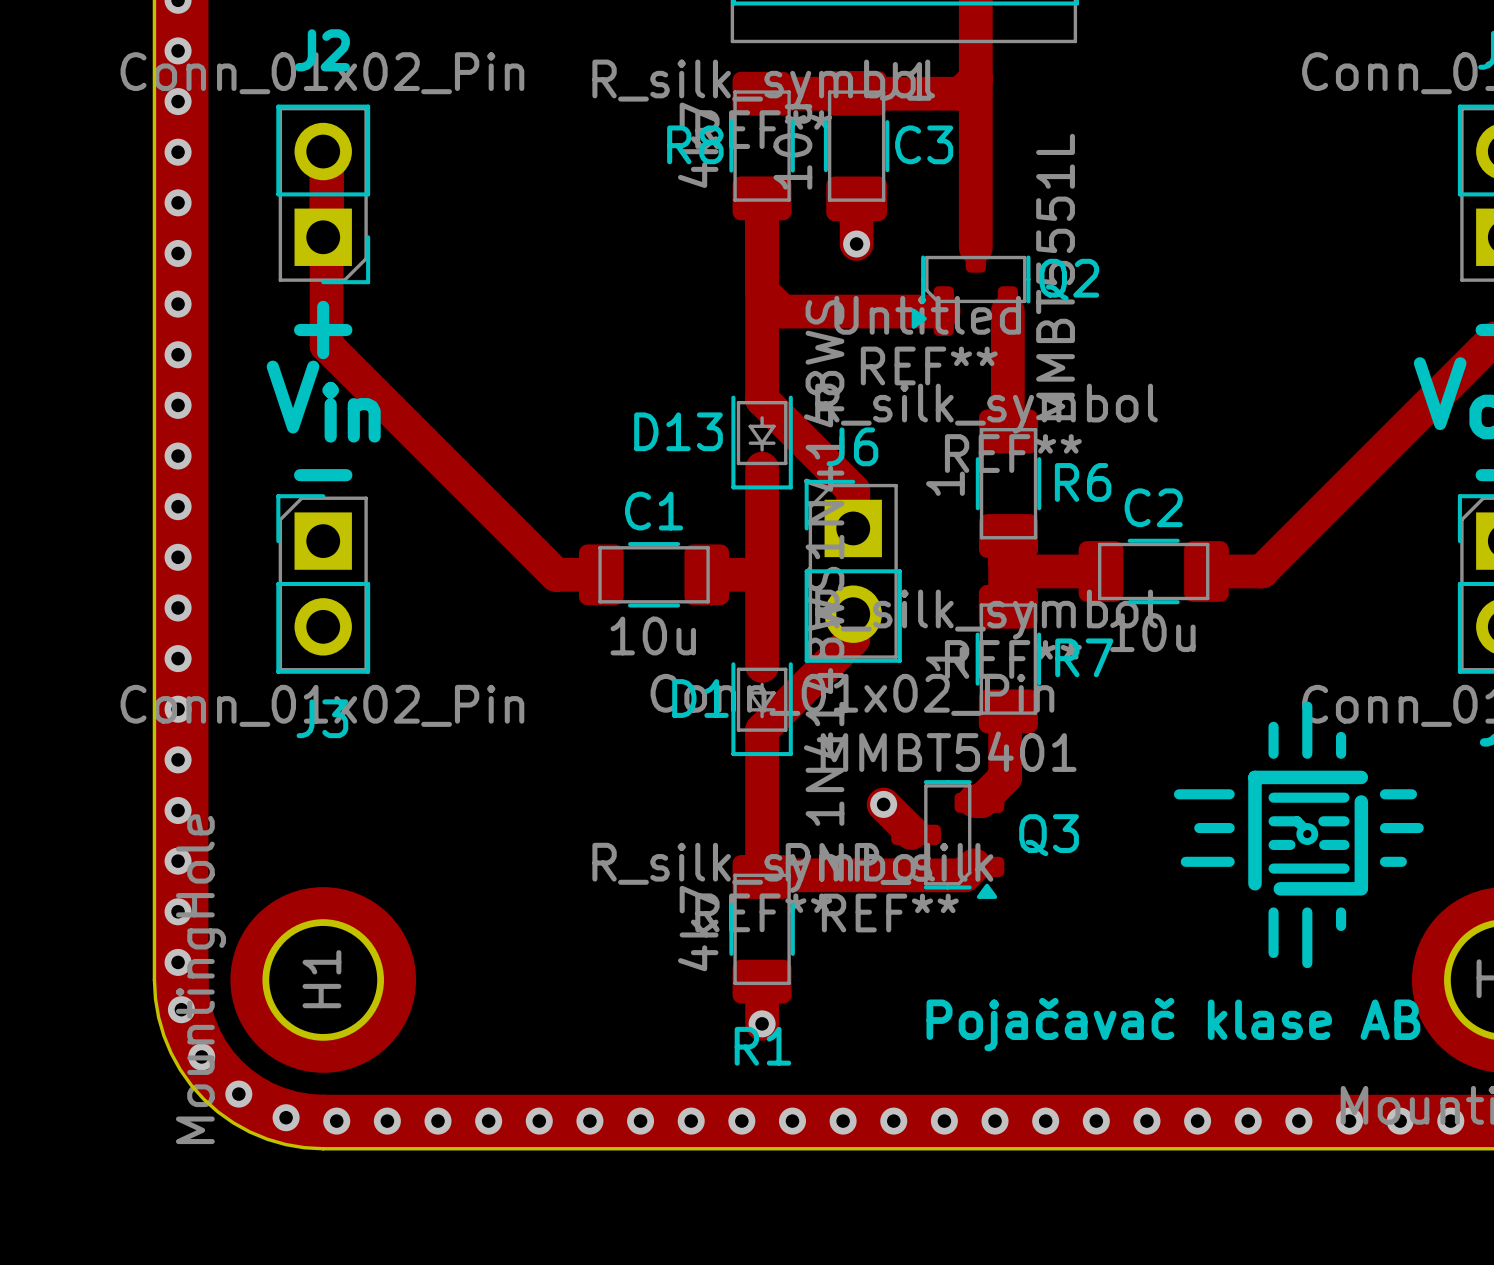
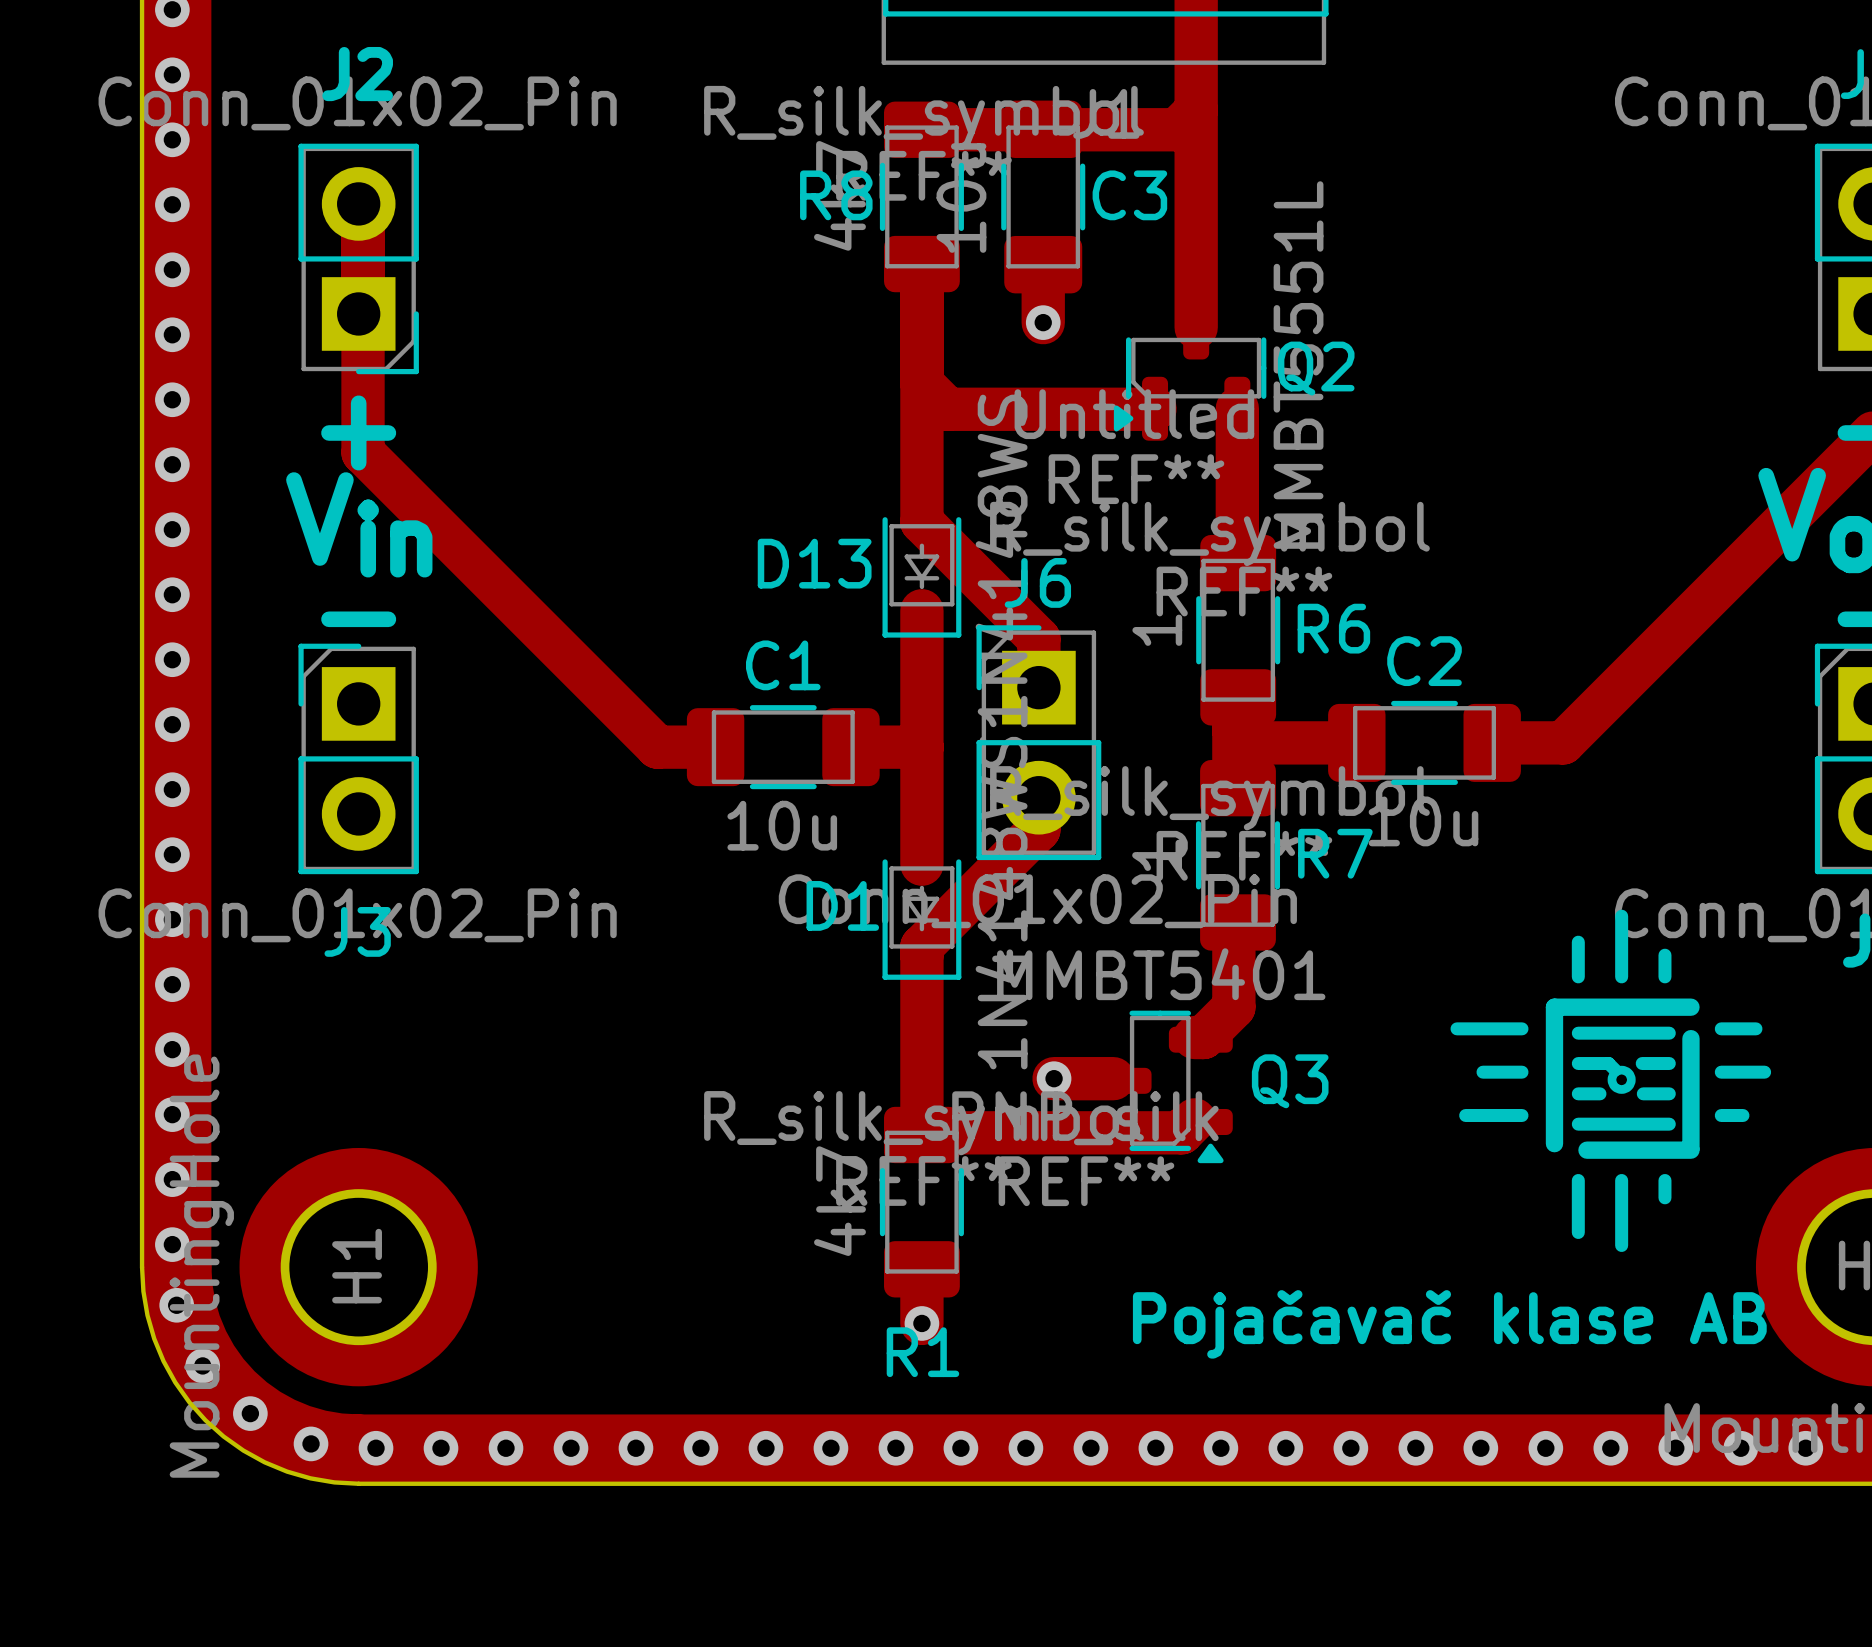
track: (883, 804) (911, 833) -> (1054, 1078) (1113, 1078)
via position: (883, 804) -> (1054, 1078)

